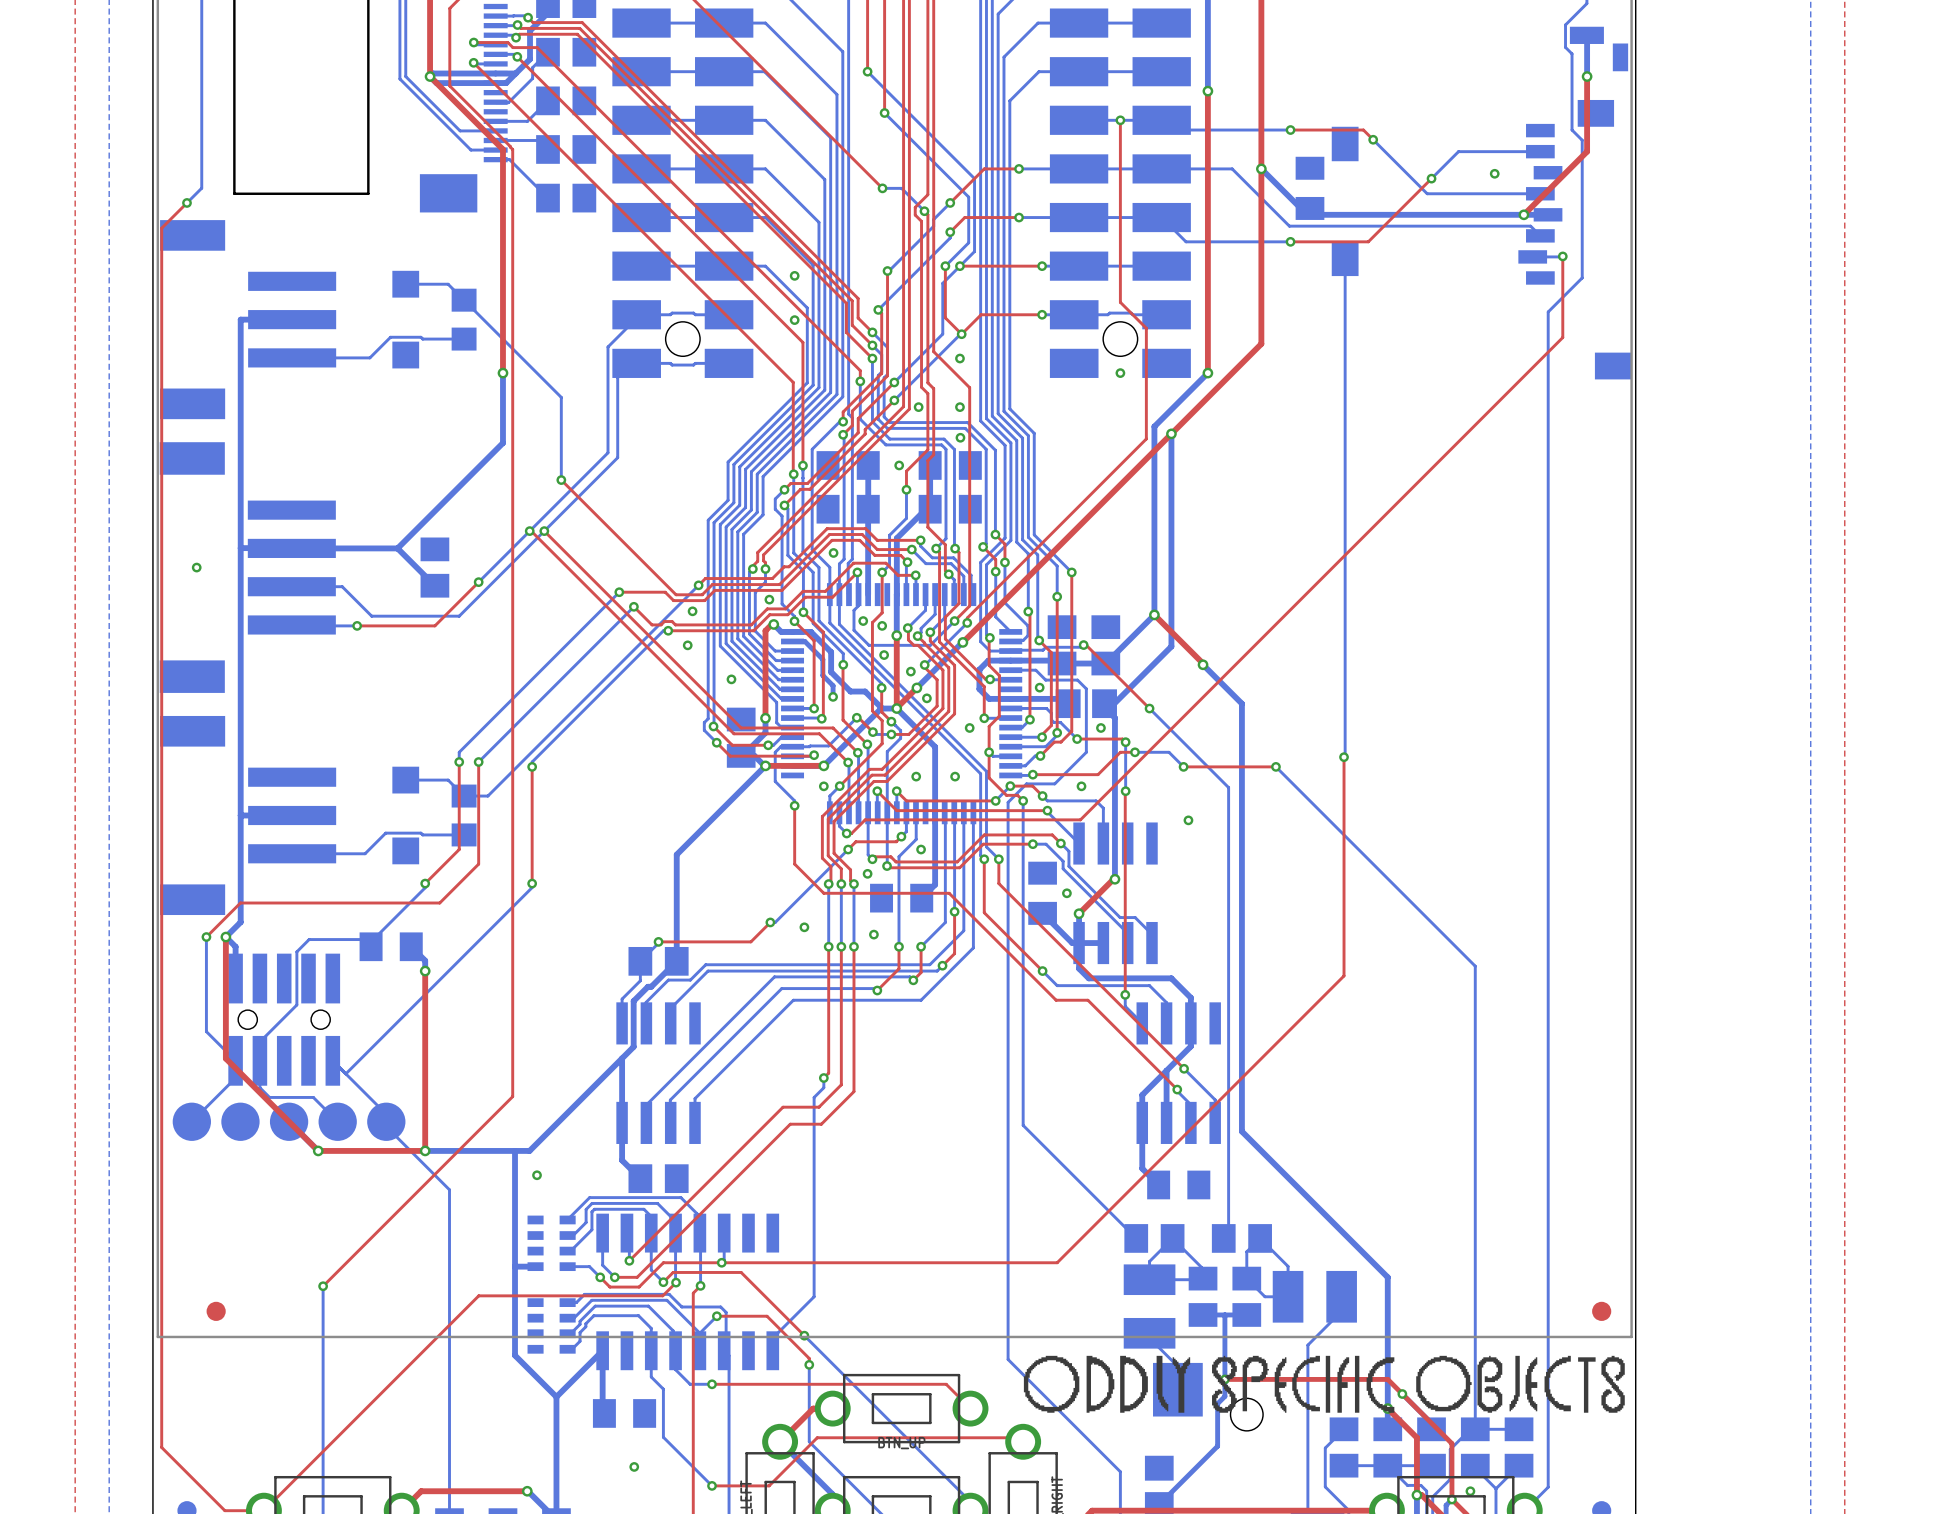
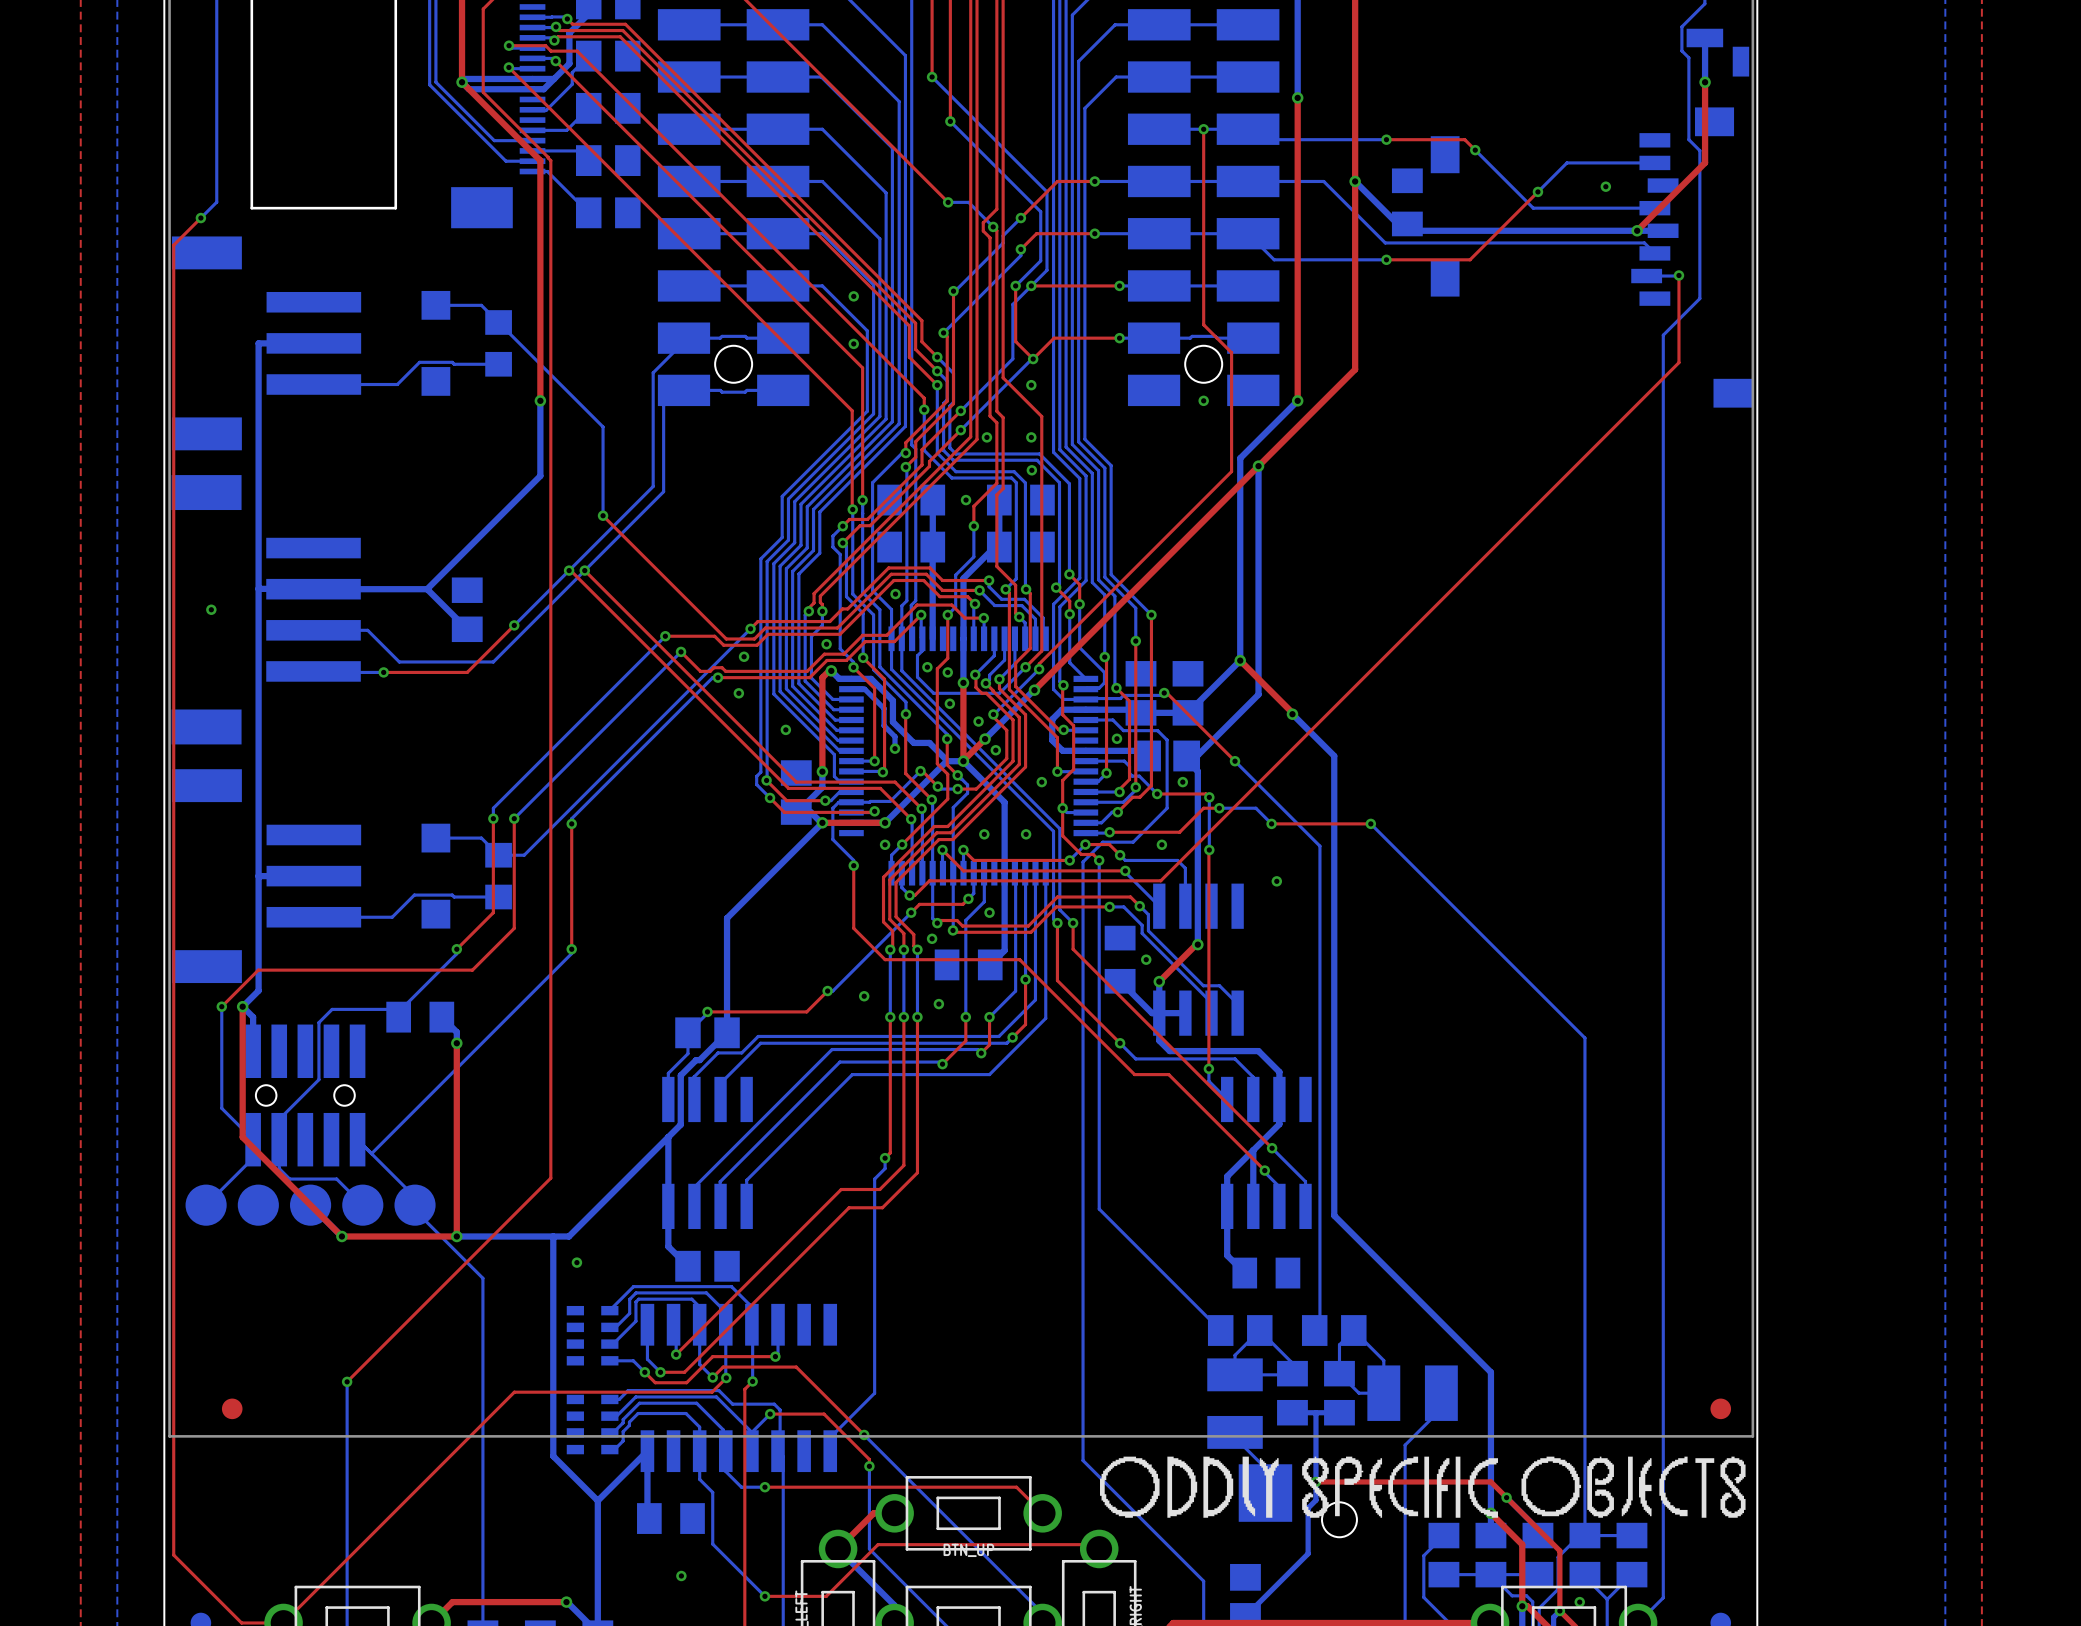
bottom track: (1345, 258) (1344, 757) -> none
top track: (1344, 757) (1344, 975) (1057, 1262) (721, 1262) -> none
via: (1344, 757) -> none
bottom track: (515, 1266) (535, 1266) -> none

